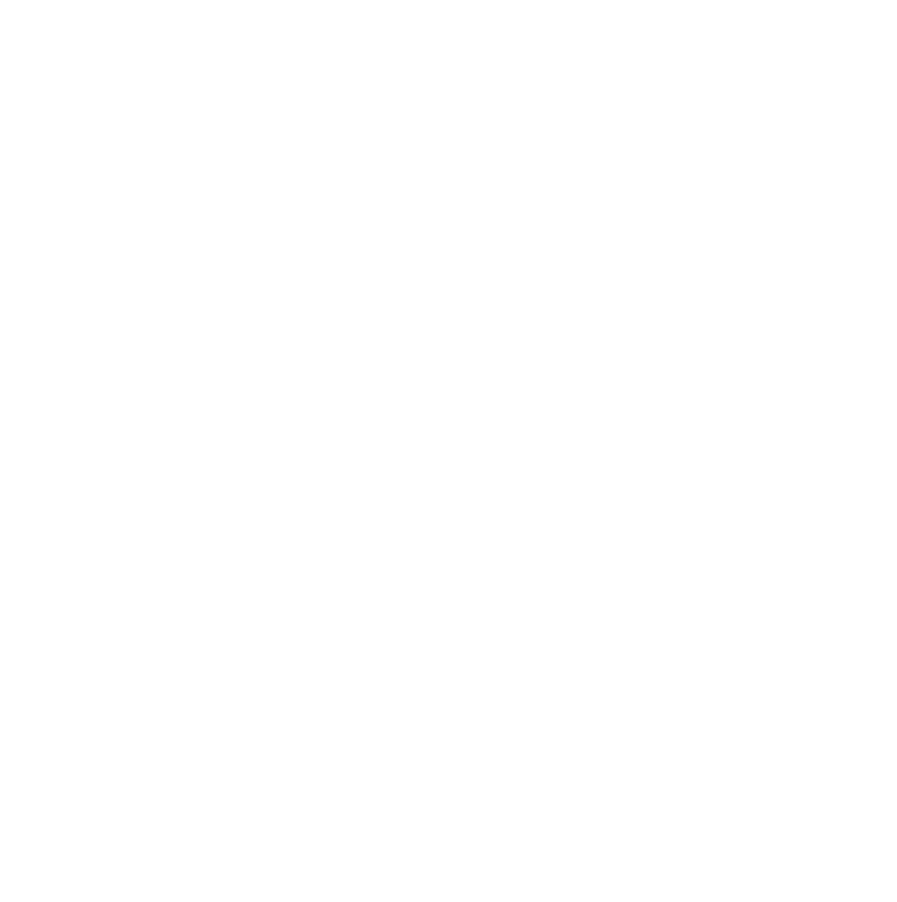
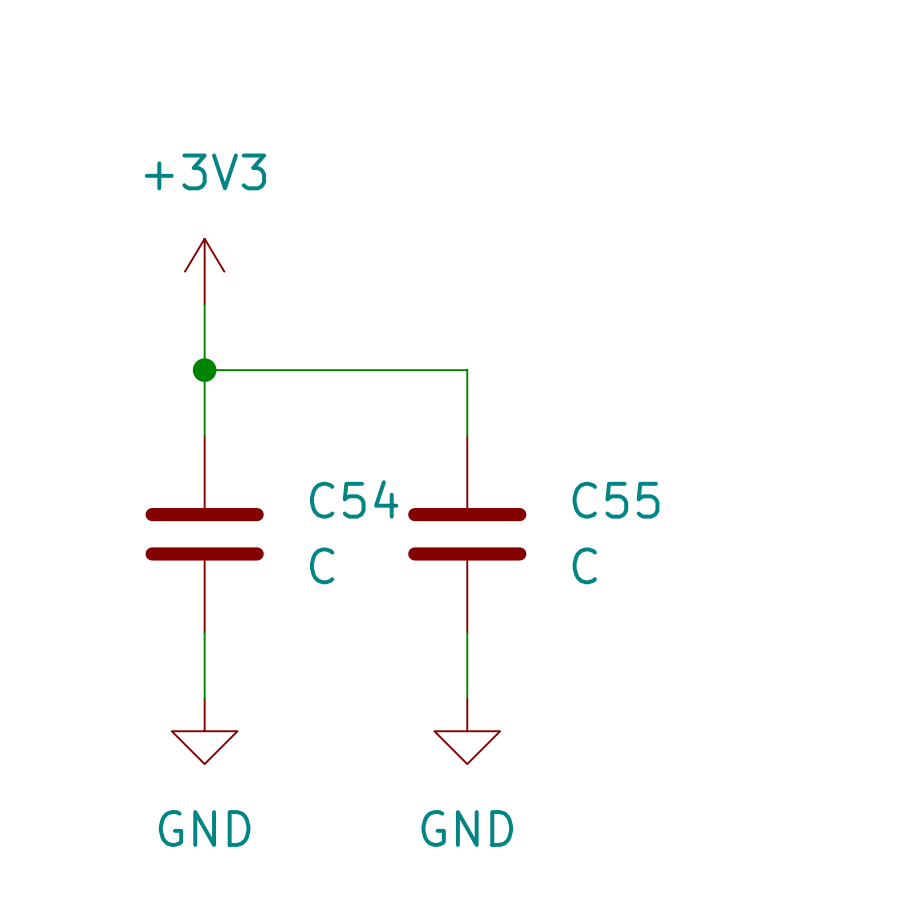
power symbol: none -> +3V3 (204, 271)
wire: none -> (204, 304) (204, 435)
wire: none -> (204, 370) (467, 370) (467, 435)
junction: none -> (204, 370)
C54: none -> C (204, 534)
C55: none -> C (467, 534)
wire: none -> (204, 632) (204, 698)
wire: none -> (467, 632) (467, 698)
power symbol: none -> GND (204, 731)
power symbol: none -> GND (467, 731)

